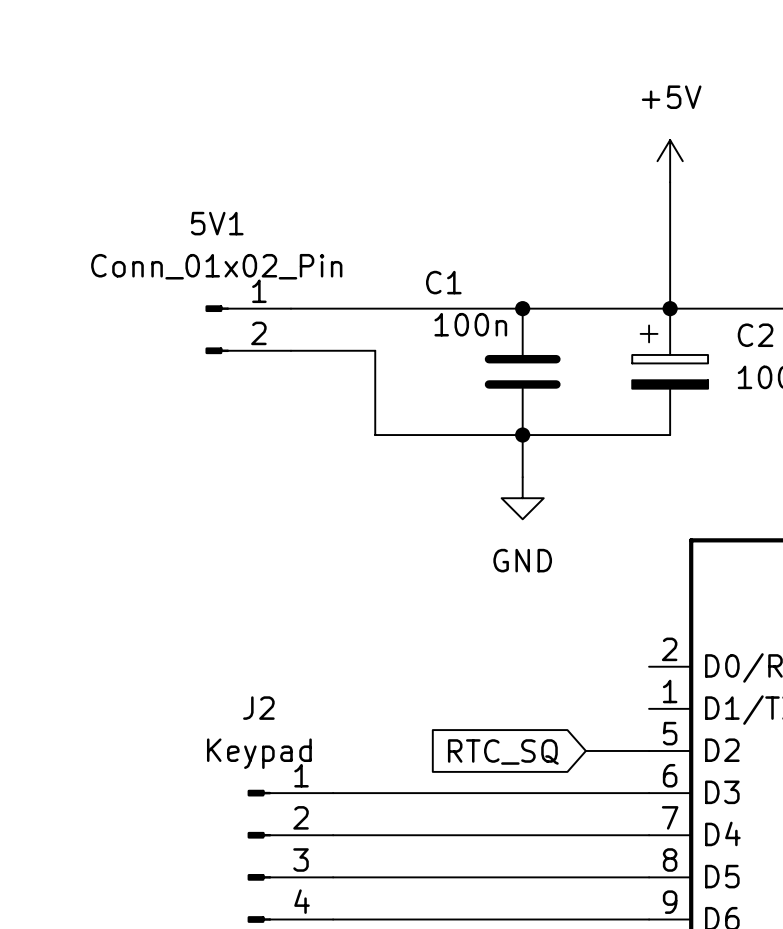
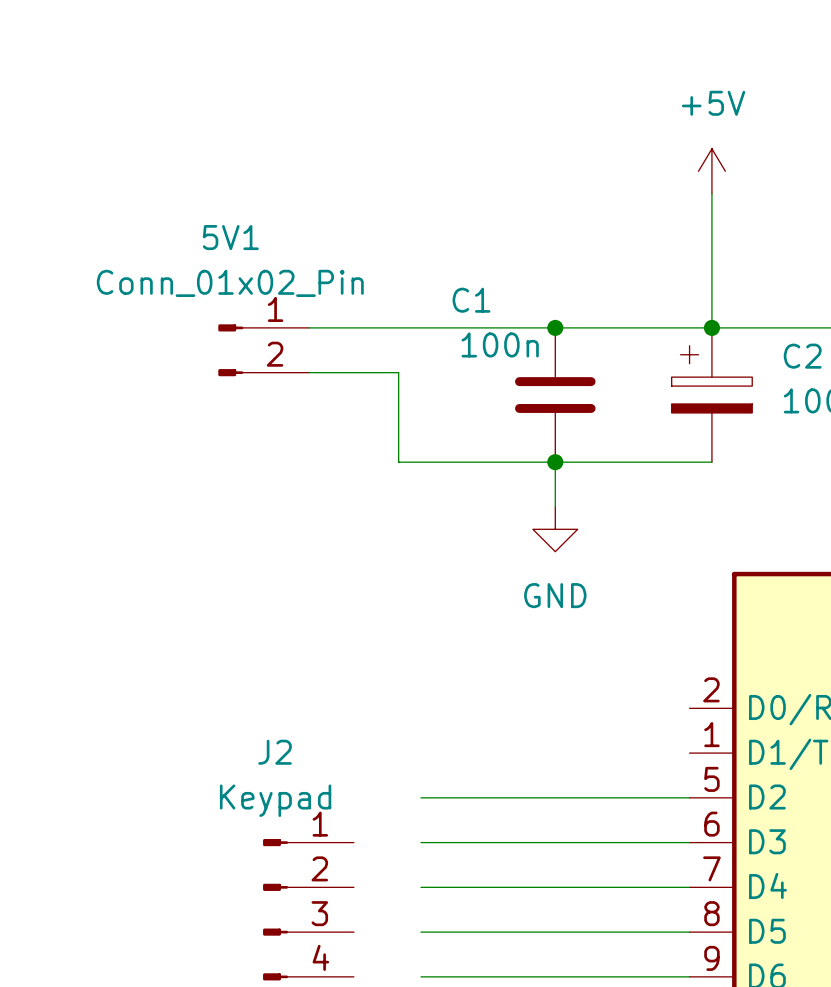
wire: none -> (421, 797) (622, 797)
global label: RTC_SQ (503, 751) -> none
wire: (333, 793) (396, 793) -> none
wire: (333, 835) (396, 835) -> none
wire: (333, 877) (396, 877) -> none
wire: (333, 919) (396, 919) -> none

